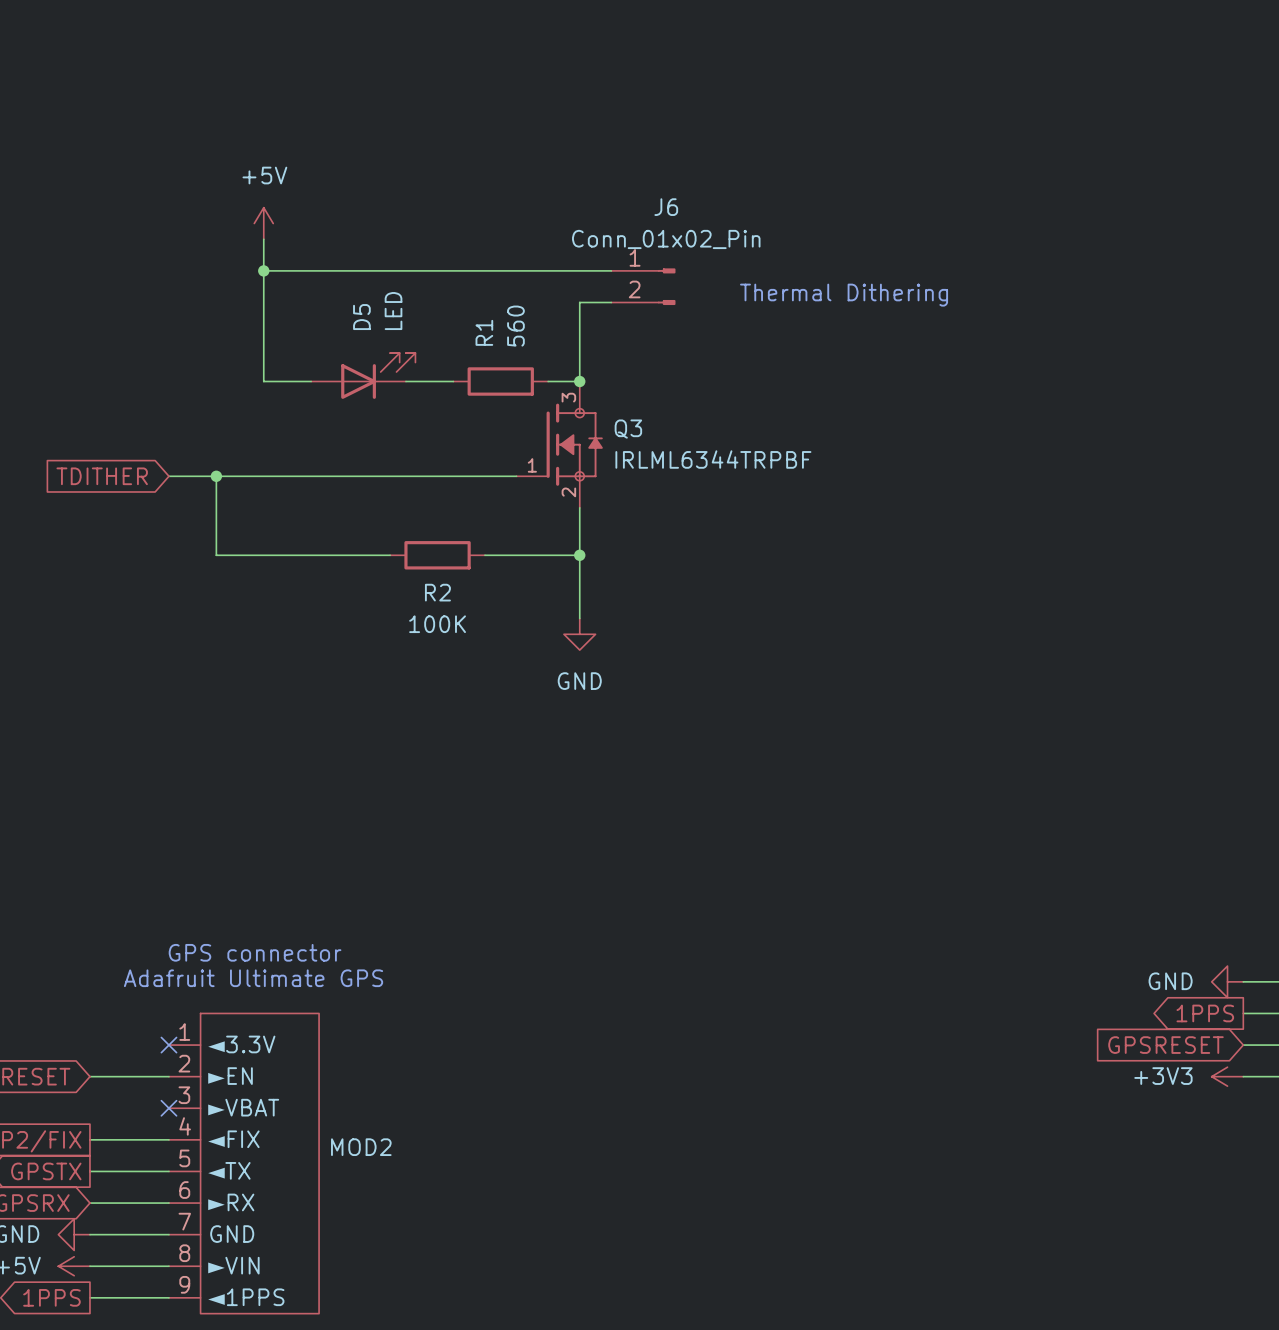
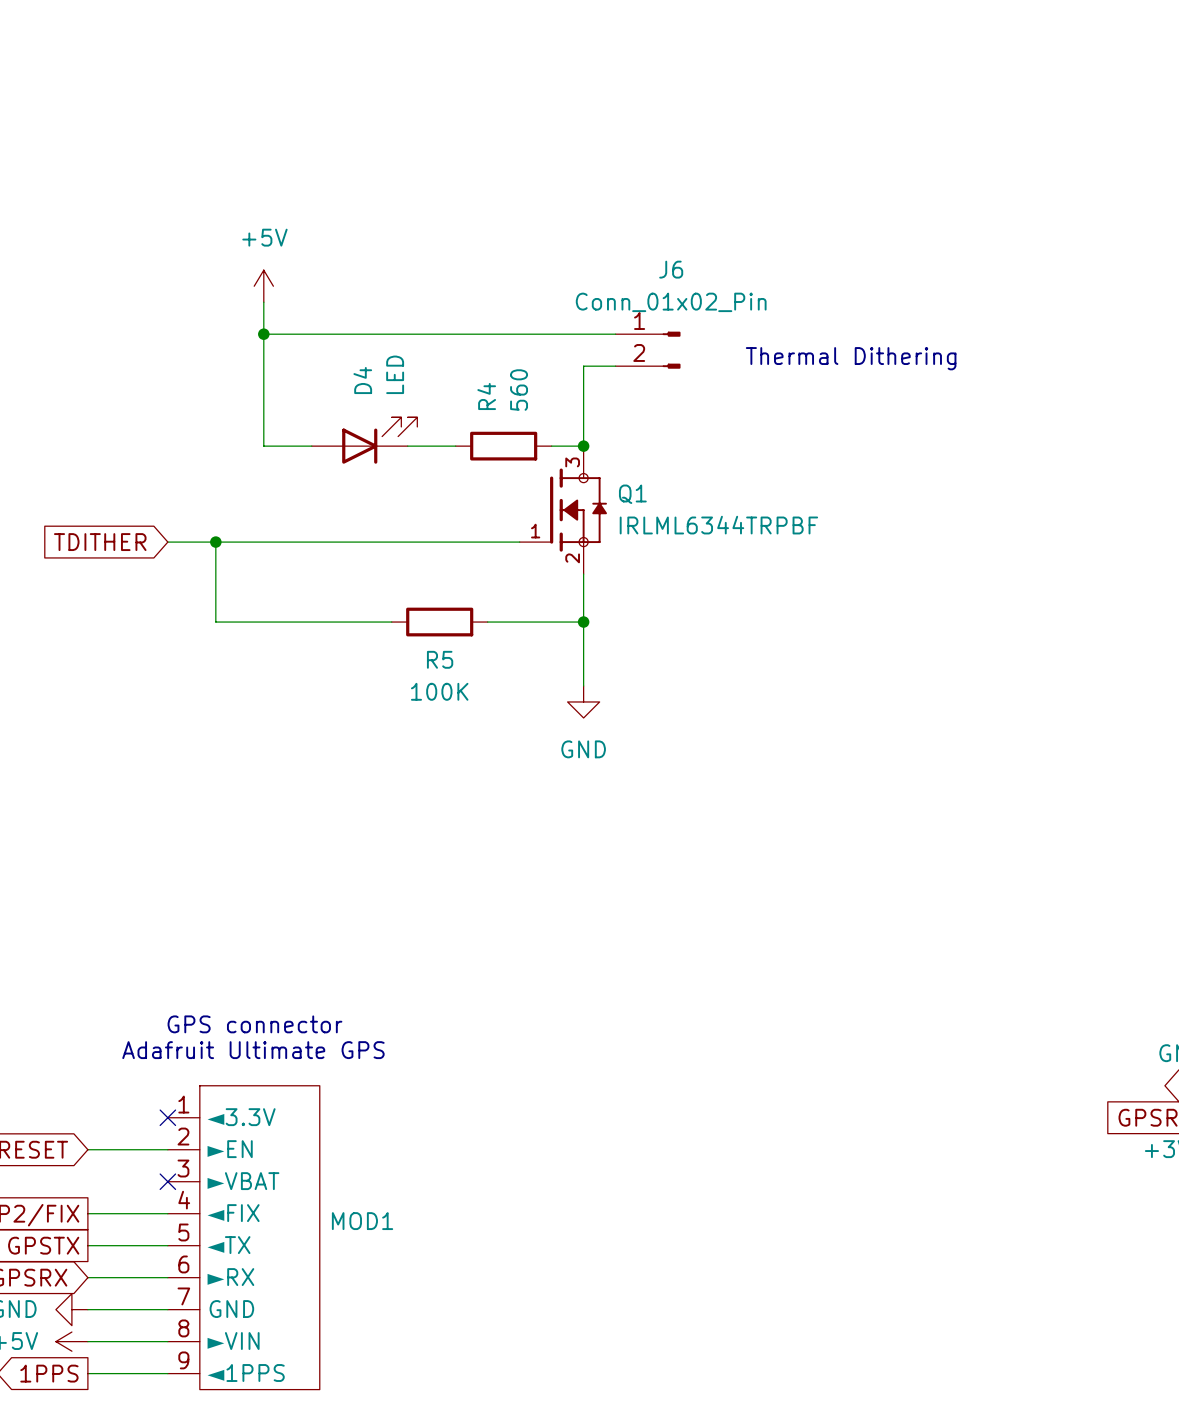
D5 name: D5 (361, 317) -> D4 (362, 380)
R1 name: R1 (484, 332) -> R4 (486, 396)
Q3 name: Q3 (628, 429) -> Q1 (632, 494)
R2 name: R2 (437, 592) -> R5 (440, 659)
MOD2 name: MOD2 (361, 1147) -> MOD1 (362, 1221)

